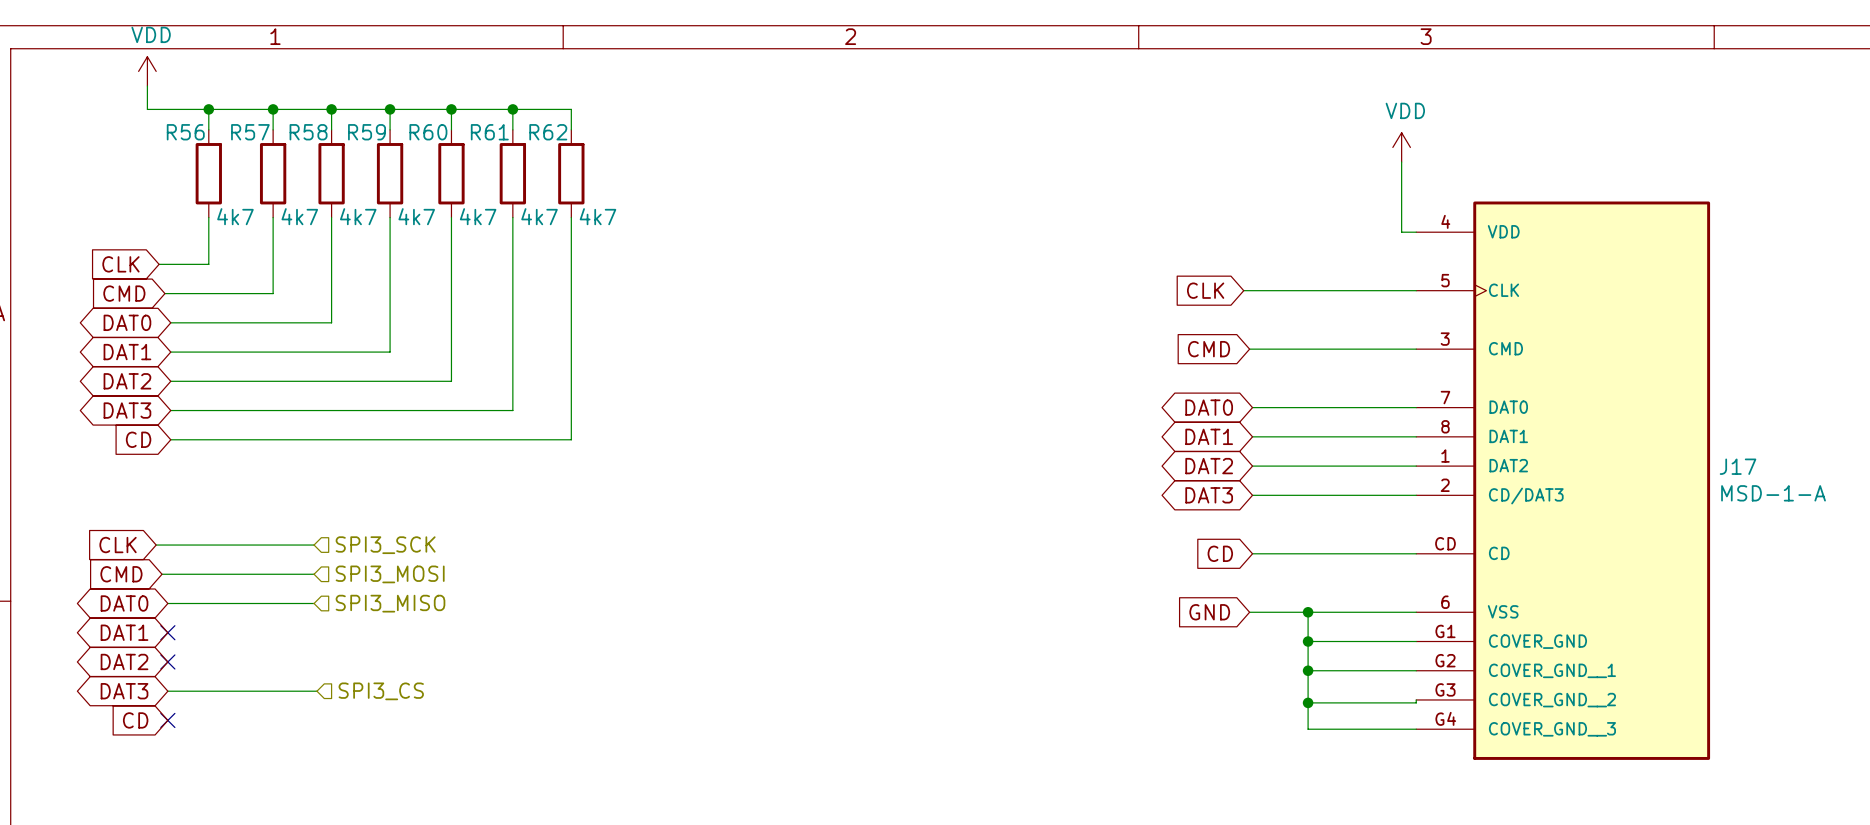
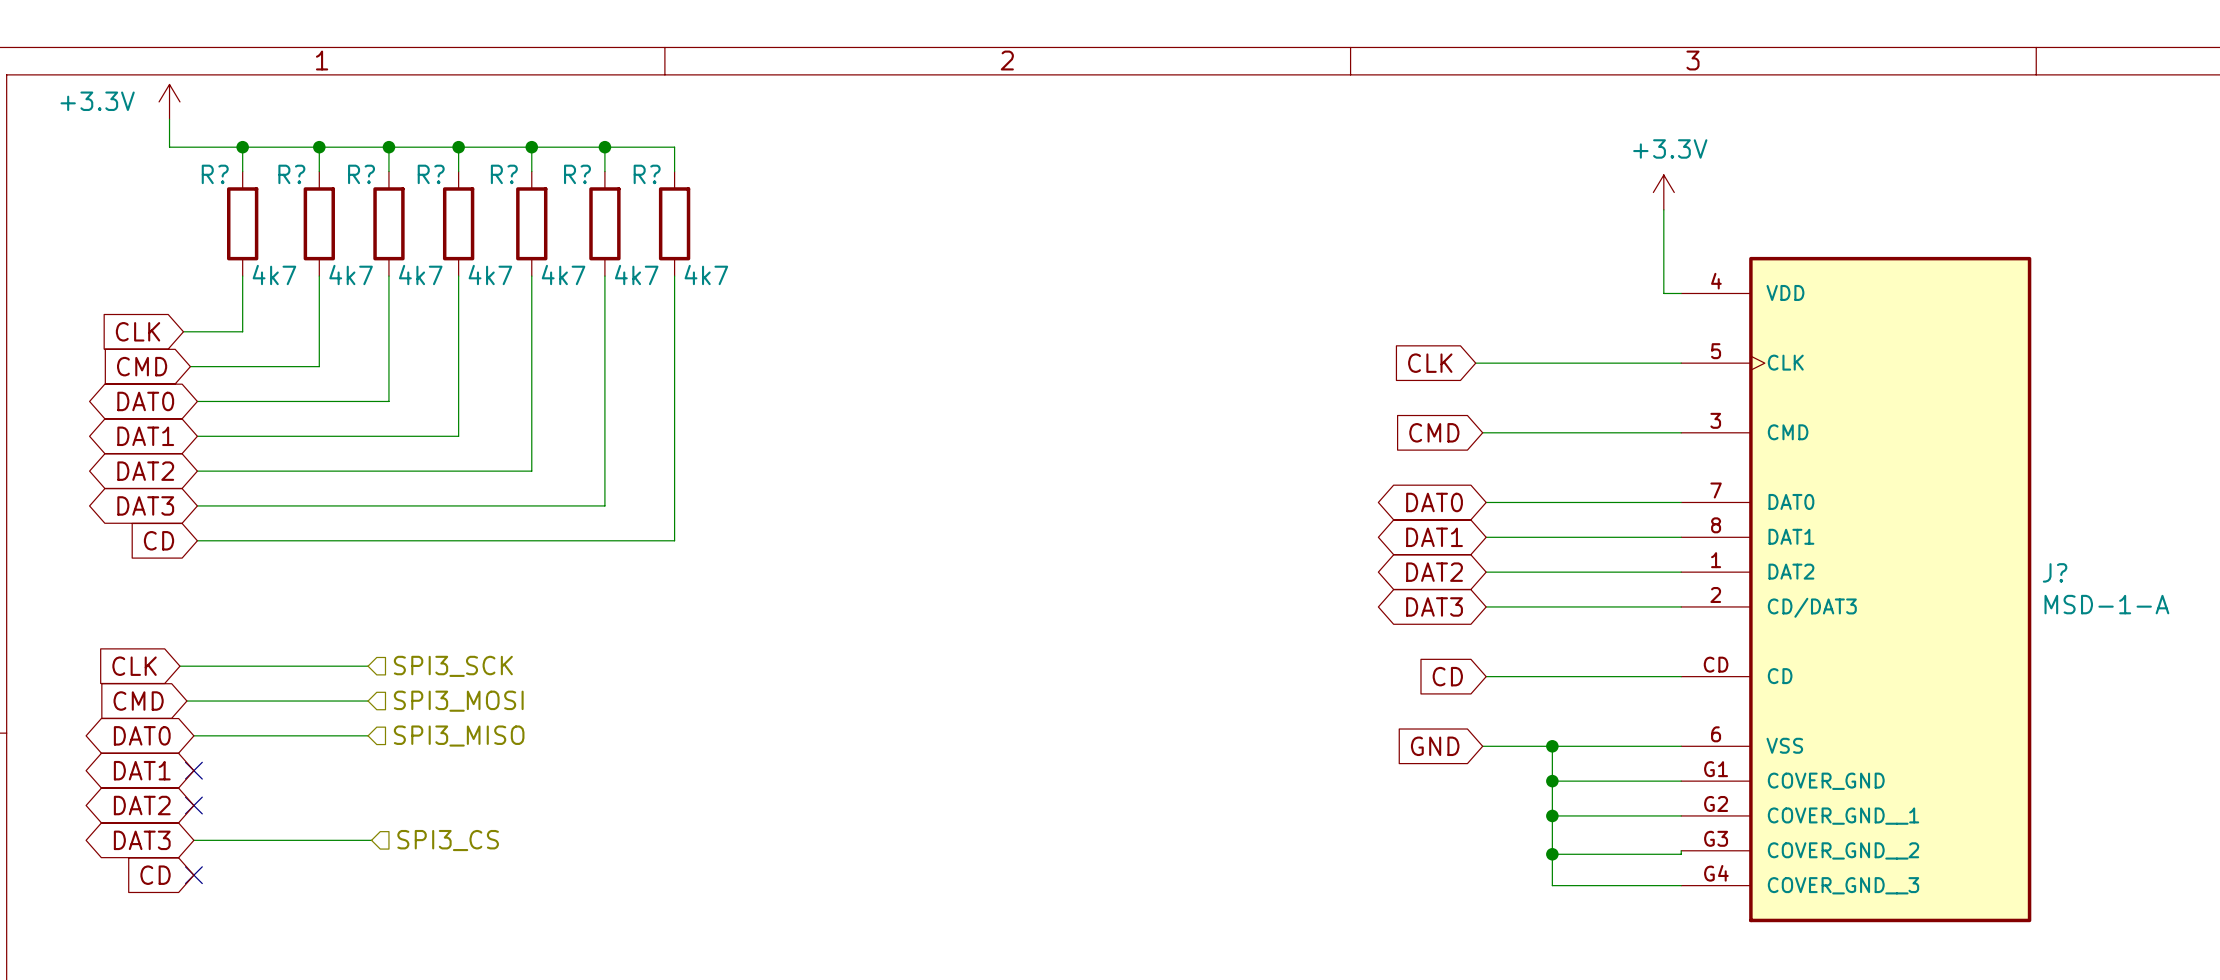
power symbol: VDD (147, 71) -> +3.3V (169, 101)
R56 name: R56 (185, 132) -> R? (215, 174)
R57 name: R57 (250, 132) -> R? (291, 174)
R58 name: R58 (308, 132) -> R? (361, 174)
R59 name: R59 (367, 132) -> R? (431, 174)
R60 name: R60 (428, 132) -> R? (504, 174)
R61 name: R61 (489, 132) -> R? (577, 174)
R62 name: R62 (548, 132) -> R? (647, 174)
power symbol: VDD (1401, 147) -> +3.3V (1663, 192)
J17 name: J17 (1738, 466) -> J? (2055, 572)

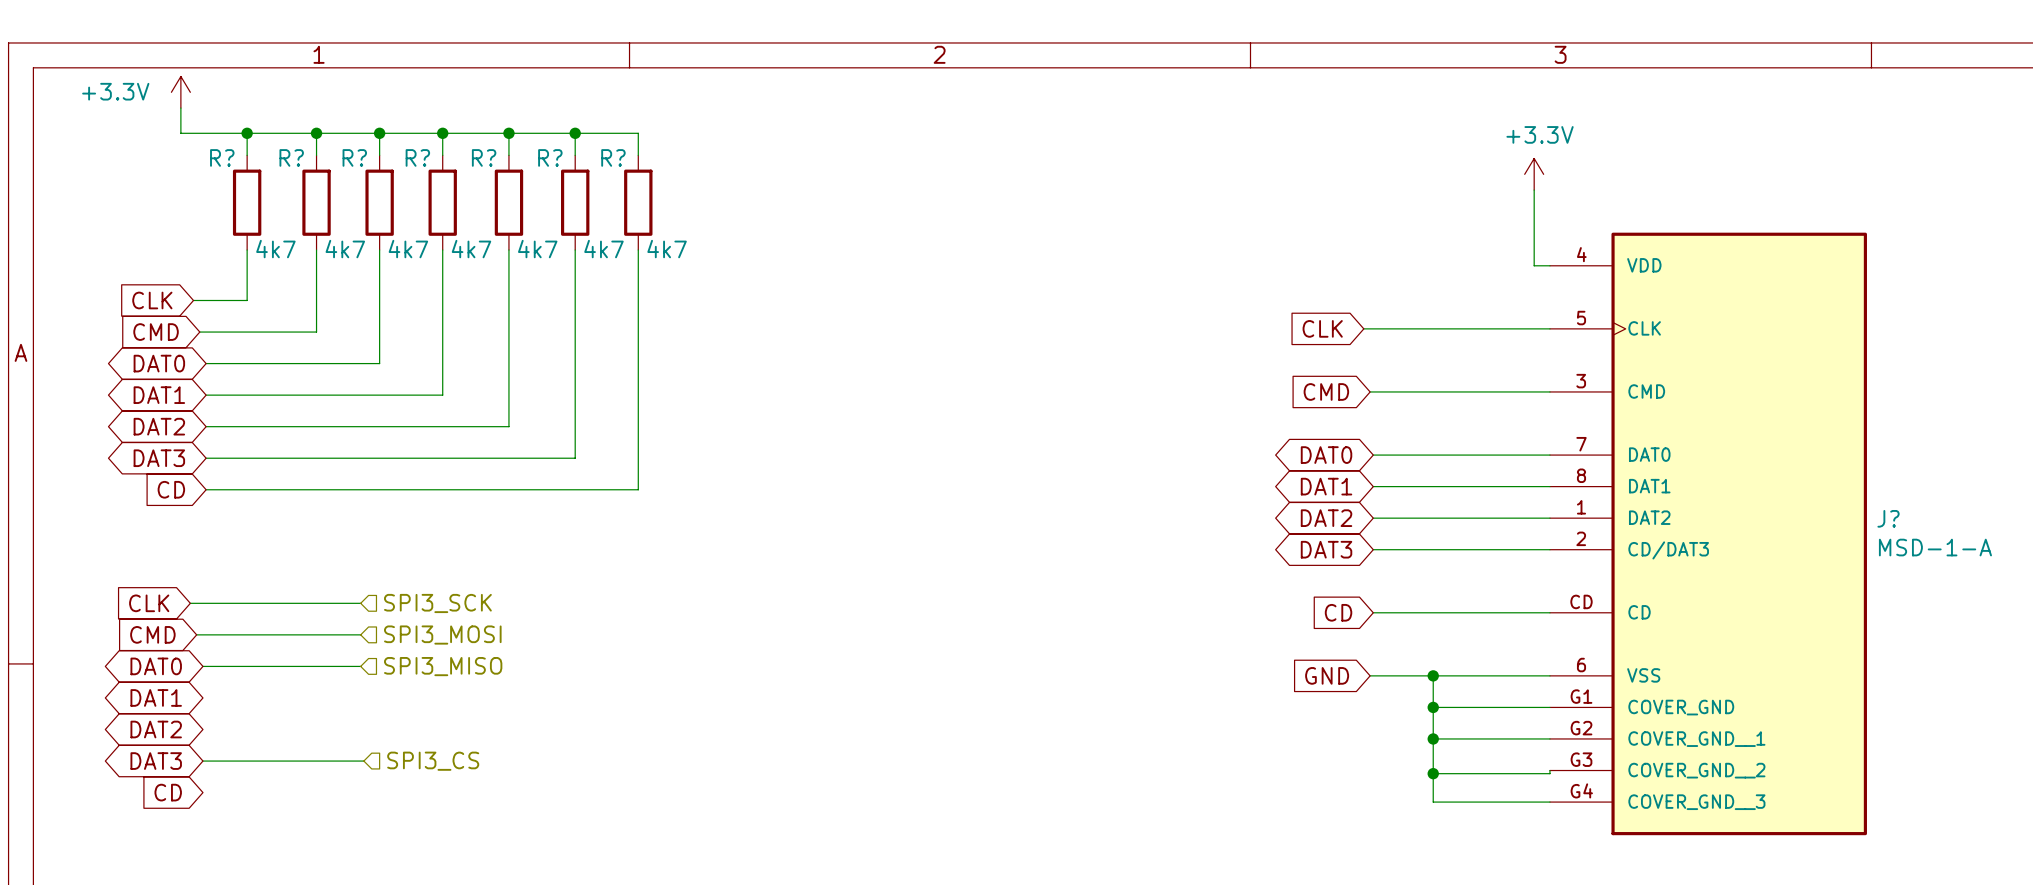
no-connect mark: (193, 770) -> none
no-connect mark: (193, 805) -> none
no-connect mark: (193, 875) -> none

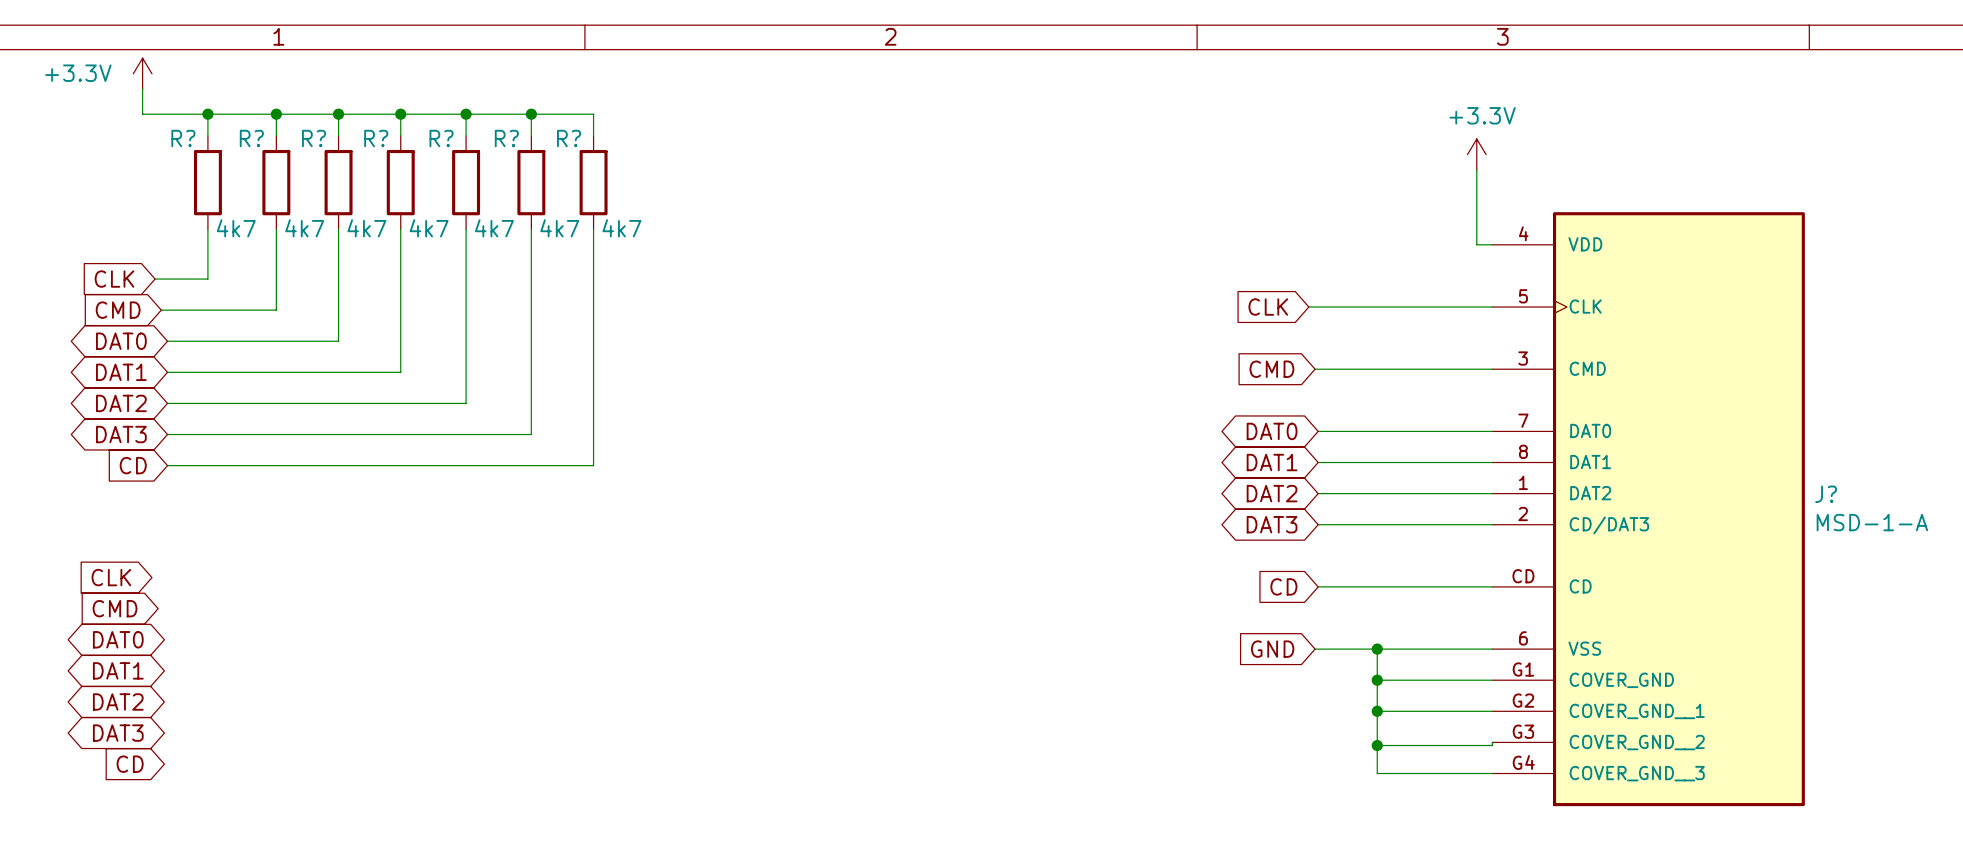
wire: (190, 603) (360, 603) -> none
hierarchical label: SPI3_SCK (437, 603) -> none
wire: (196, 634) (360, 634) -> none
hierarchical label: SPI3_MOSI (442, 635) -> none
wire: (202, 666) (360, 666) -> none
hierarchical label: SPI3_MISO (443, 666) -> none
wire: (202, 761) (363, 761) -> none
hierarchical label: SPI3_CS (433, 761) -> none

